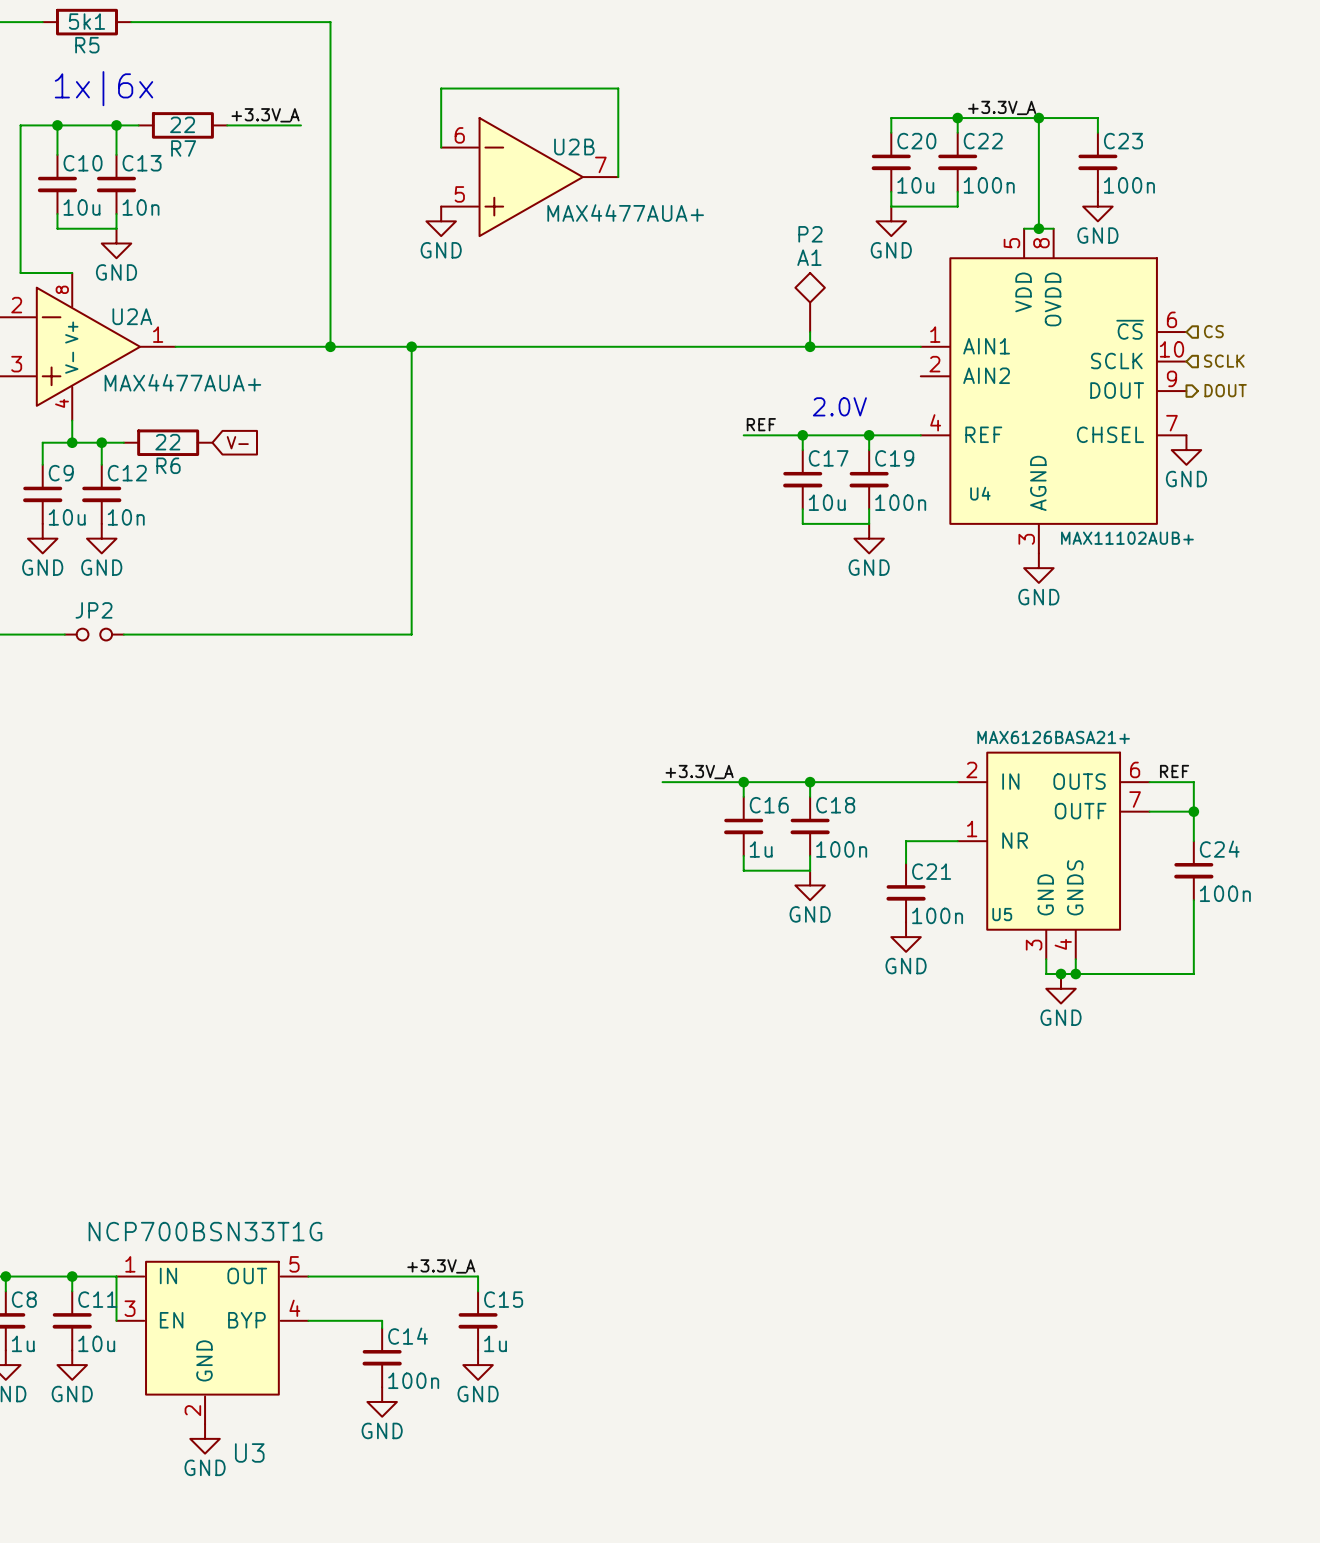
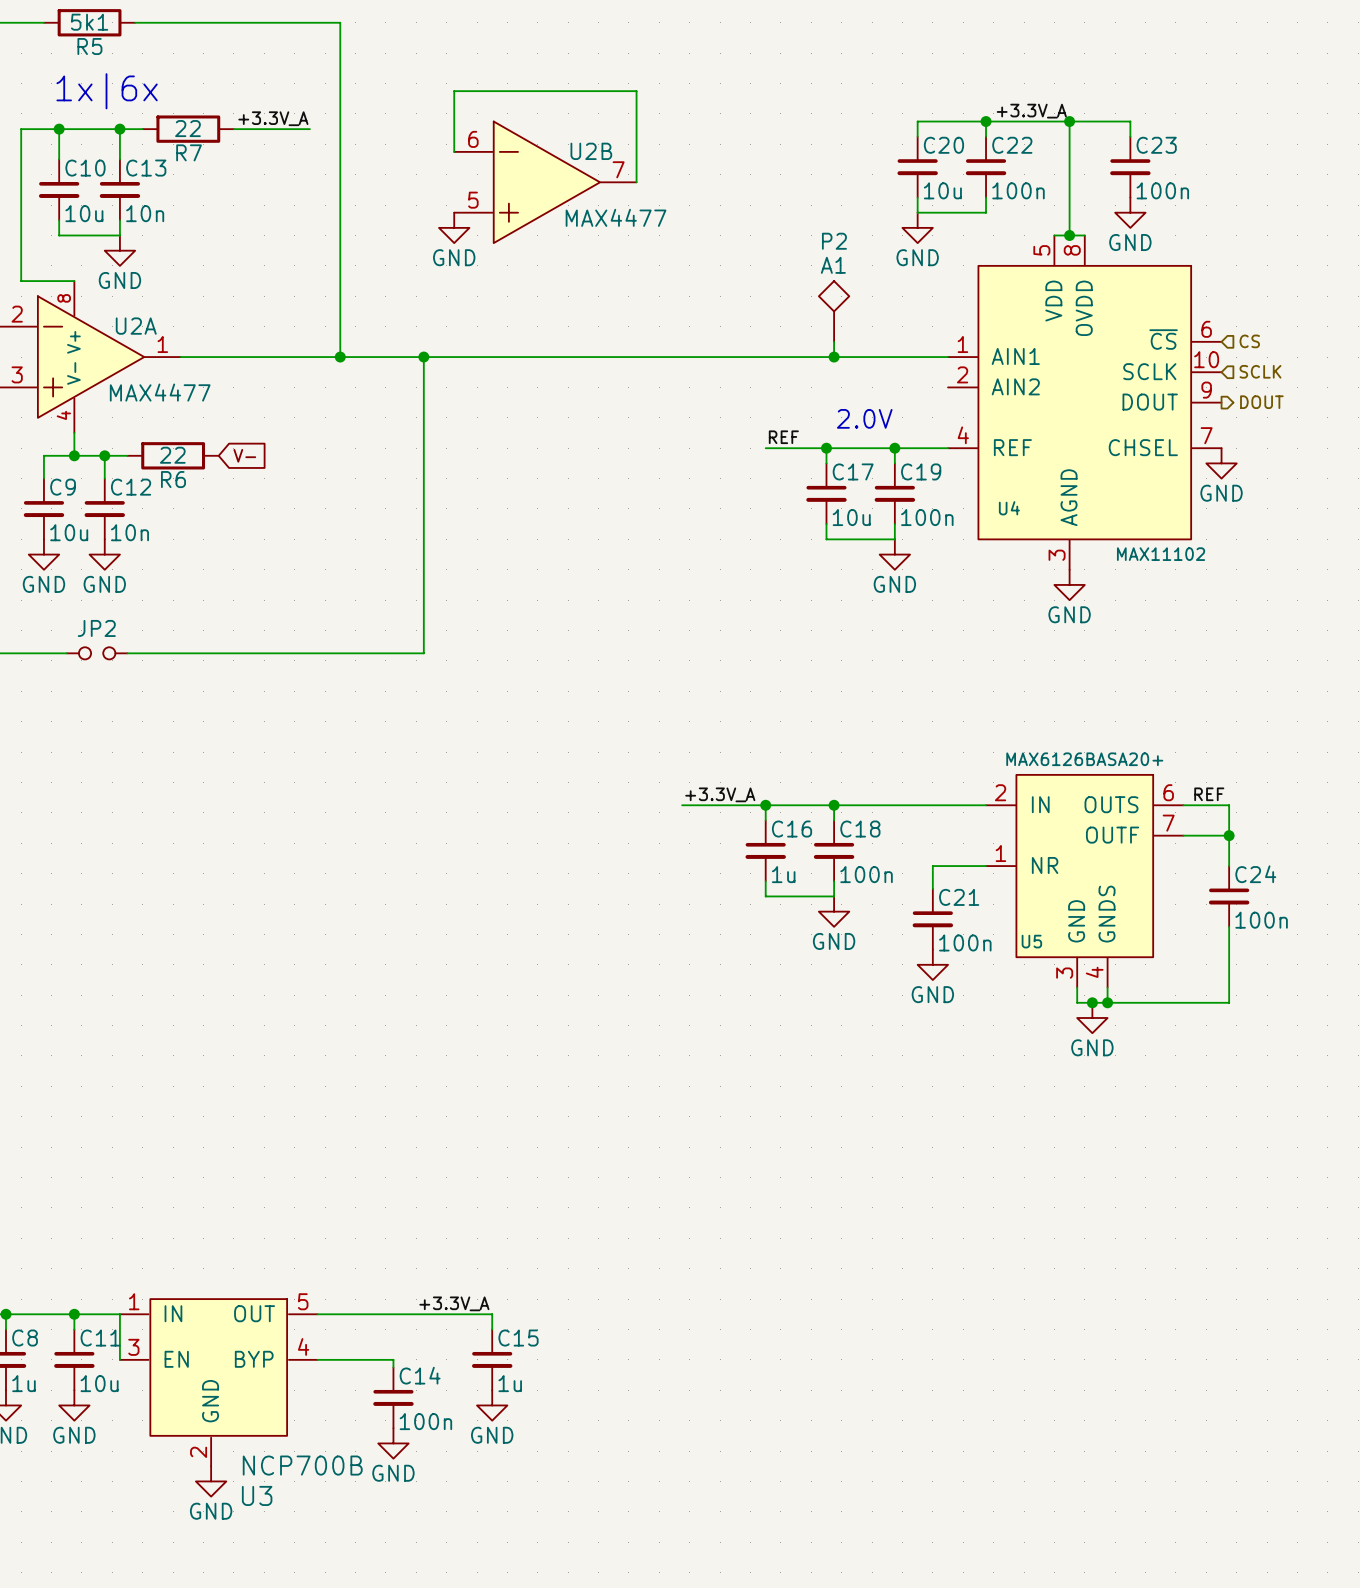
U2B value: MAX4477AUA+ (625, 213) -> MAX4477 (616, 217)
U2A value: MAX4477AUA+ (182, 382) -> MAX4477 (160, 392)
U4 value: MAX11102AUB+ (1127, 538) -> MAX11102 (1161, 554)
U5 value: MAX6126BASA21+ (1053, 737) -> MAX6126BASA20+ (1084, 759)
U3 value: NCP700BSN33T1G (205, 1231) -> NCP700B (302, 1465)

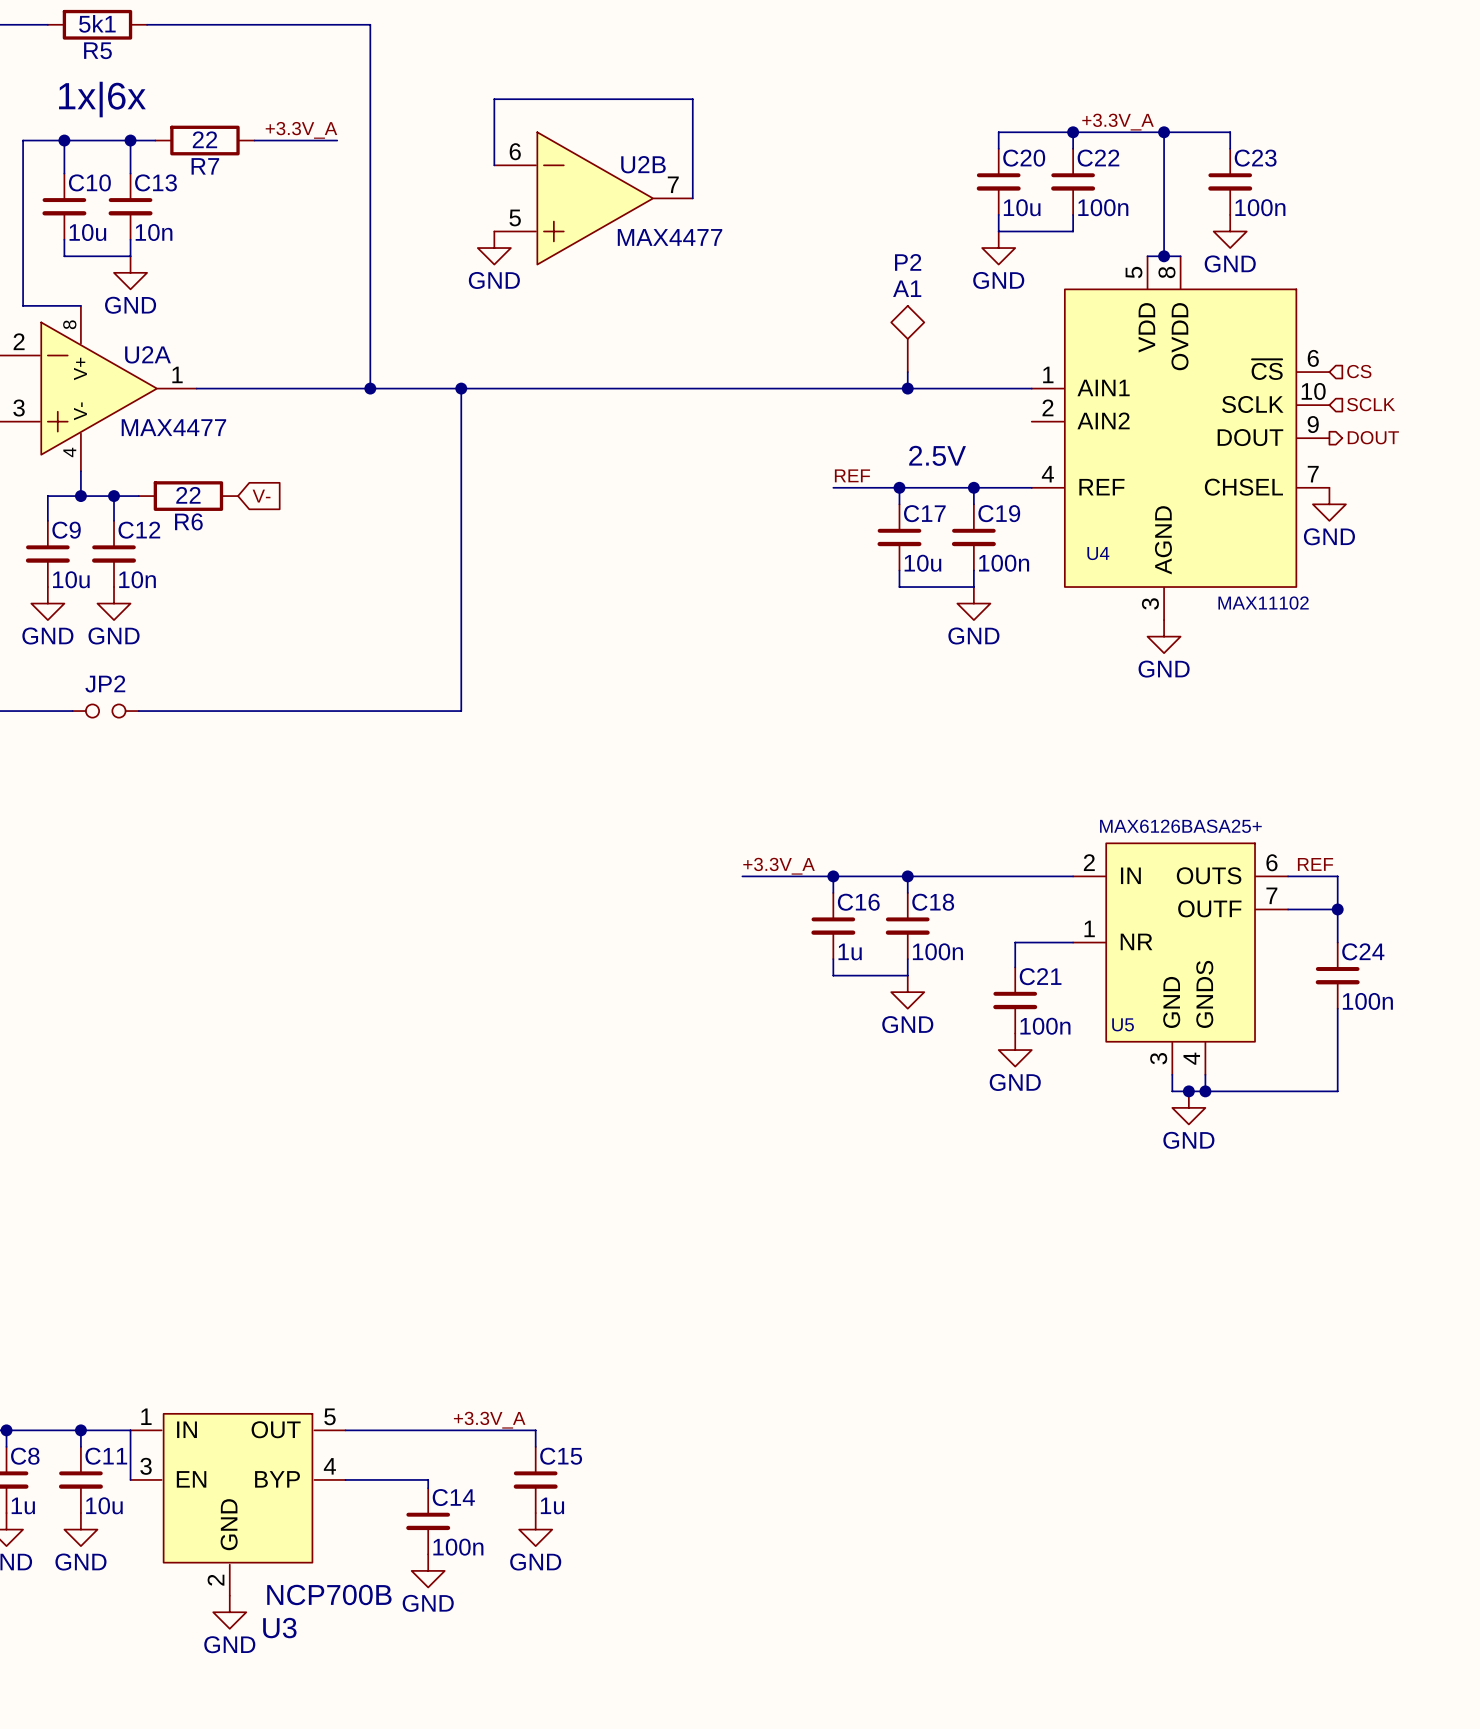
text: 2.0V (864, 418) -> 2.5V (937, 455)
U5 value: MAX6126BASA20+ (1084, 759) -> MAX6126BASA25+ (1180, 826)

